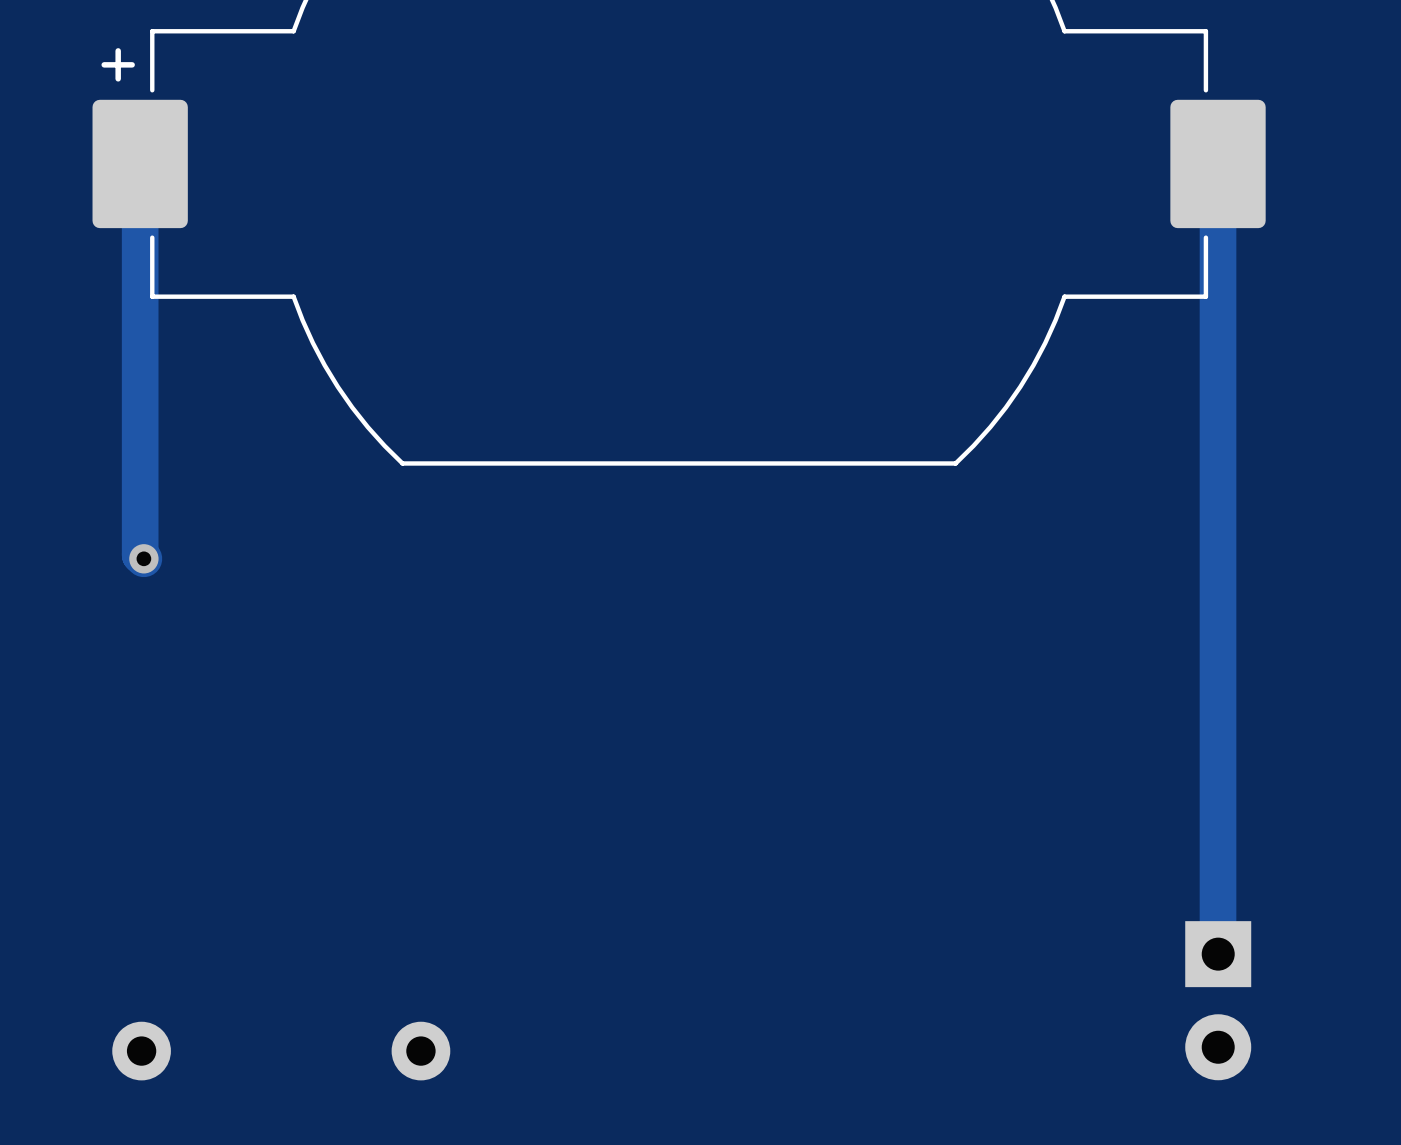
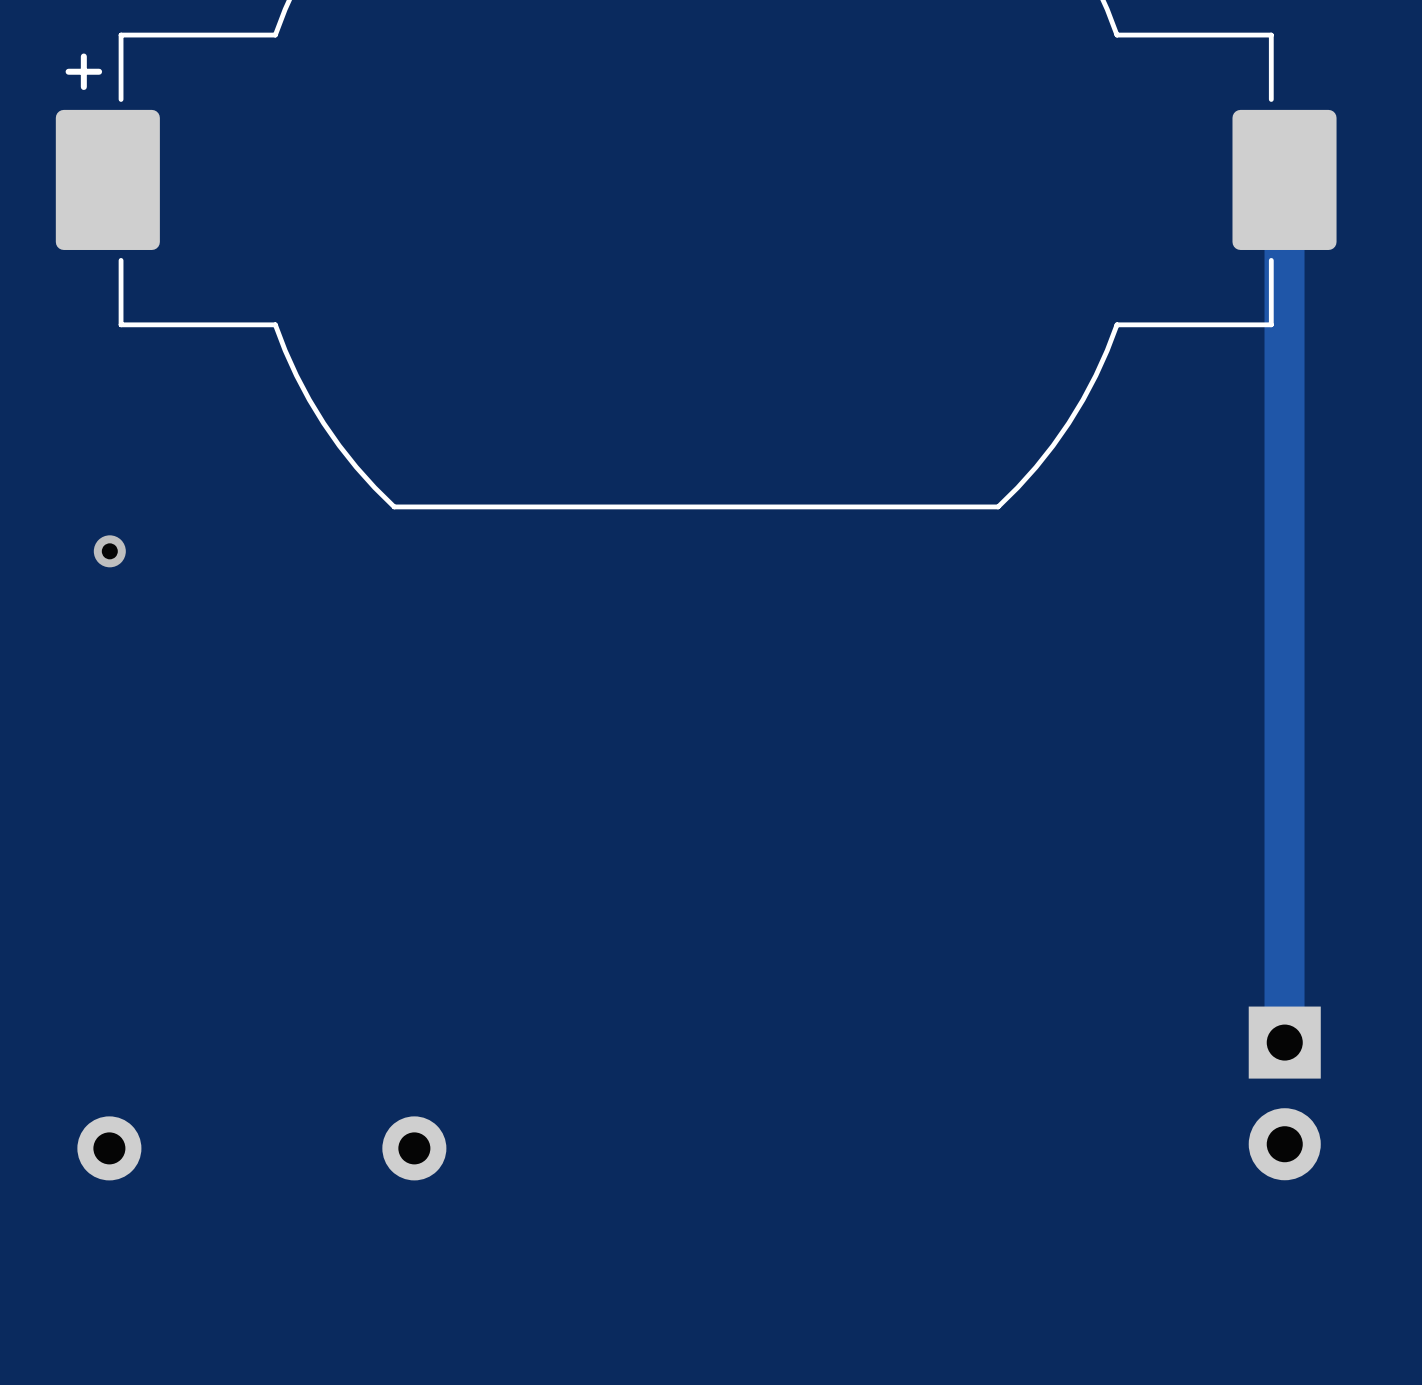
track: (140, 163) (140, 555) (143, 558) -> none
via position: (143, 558) -> (109, 551)

